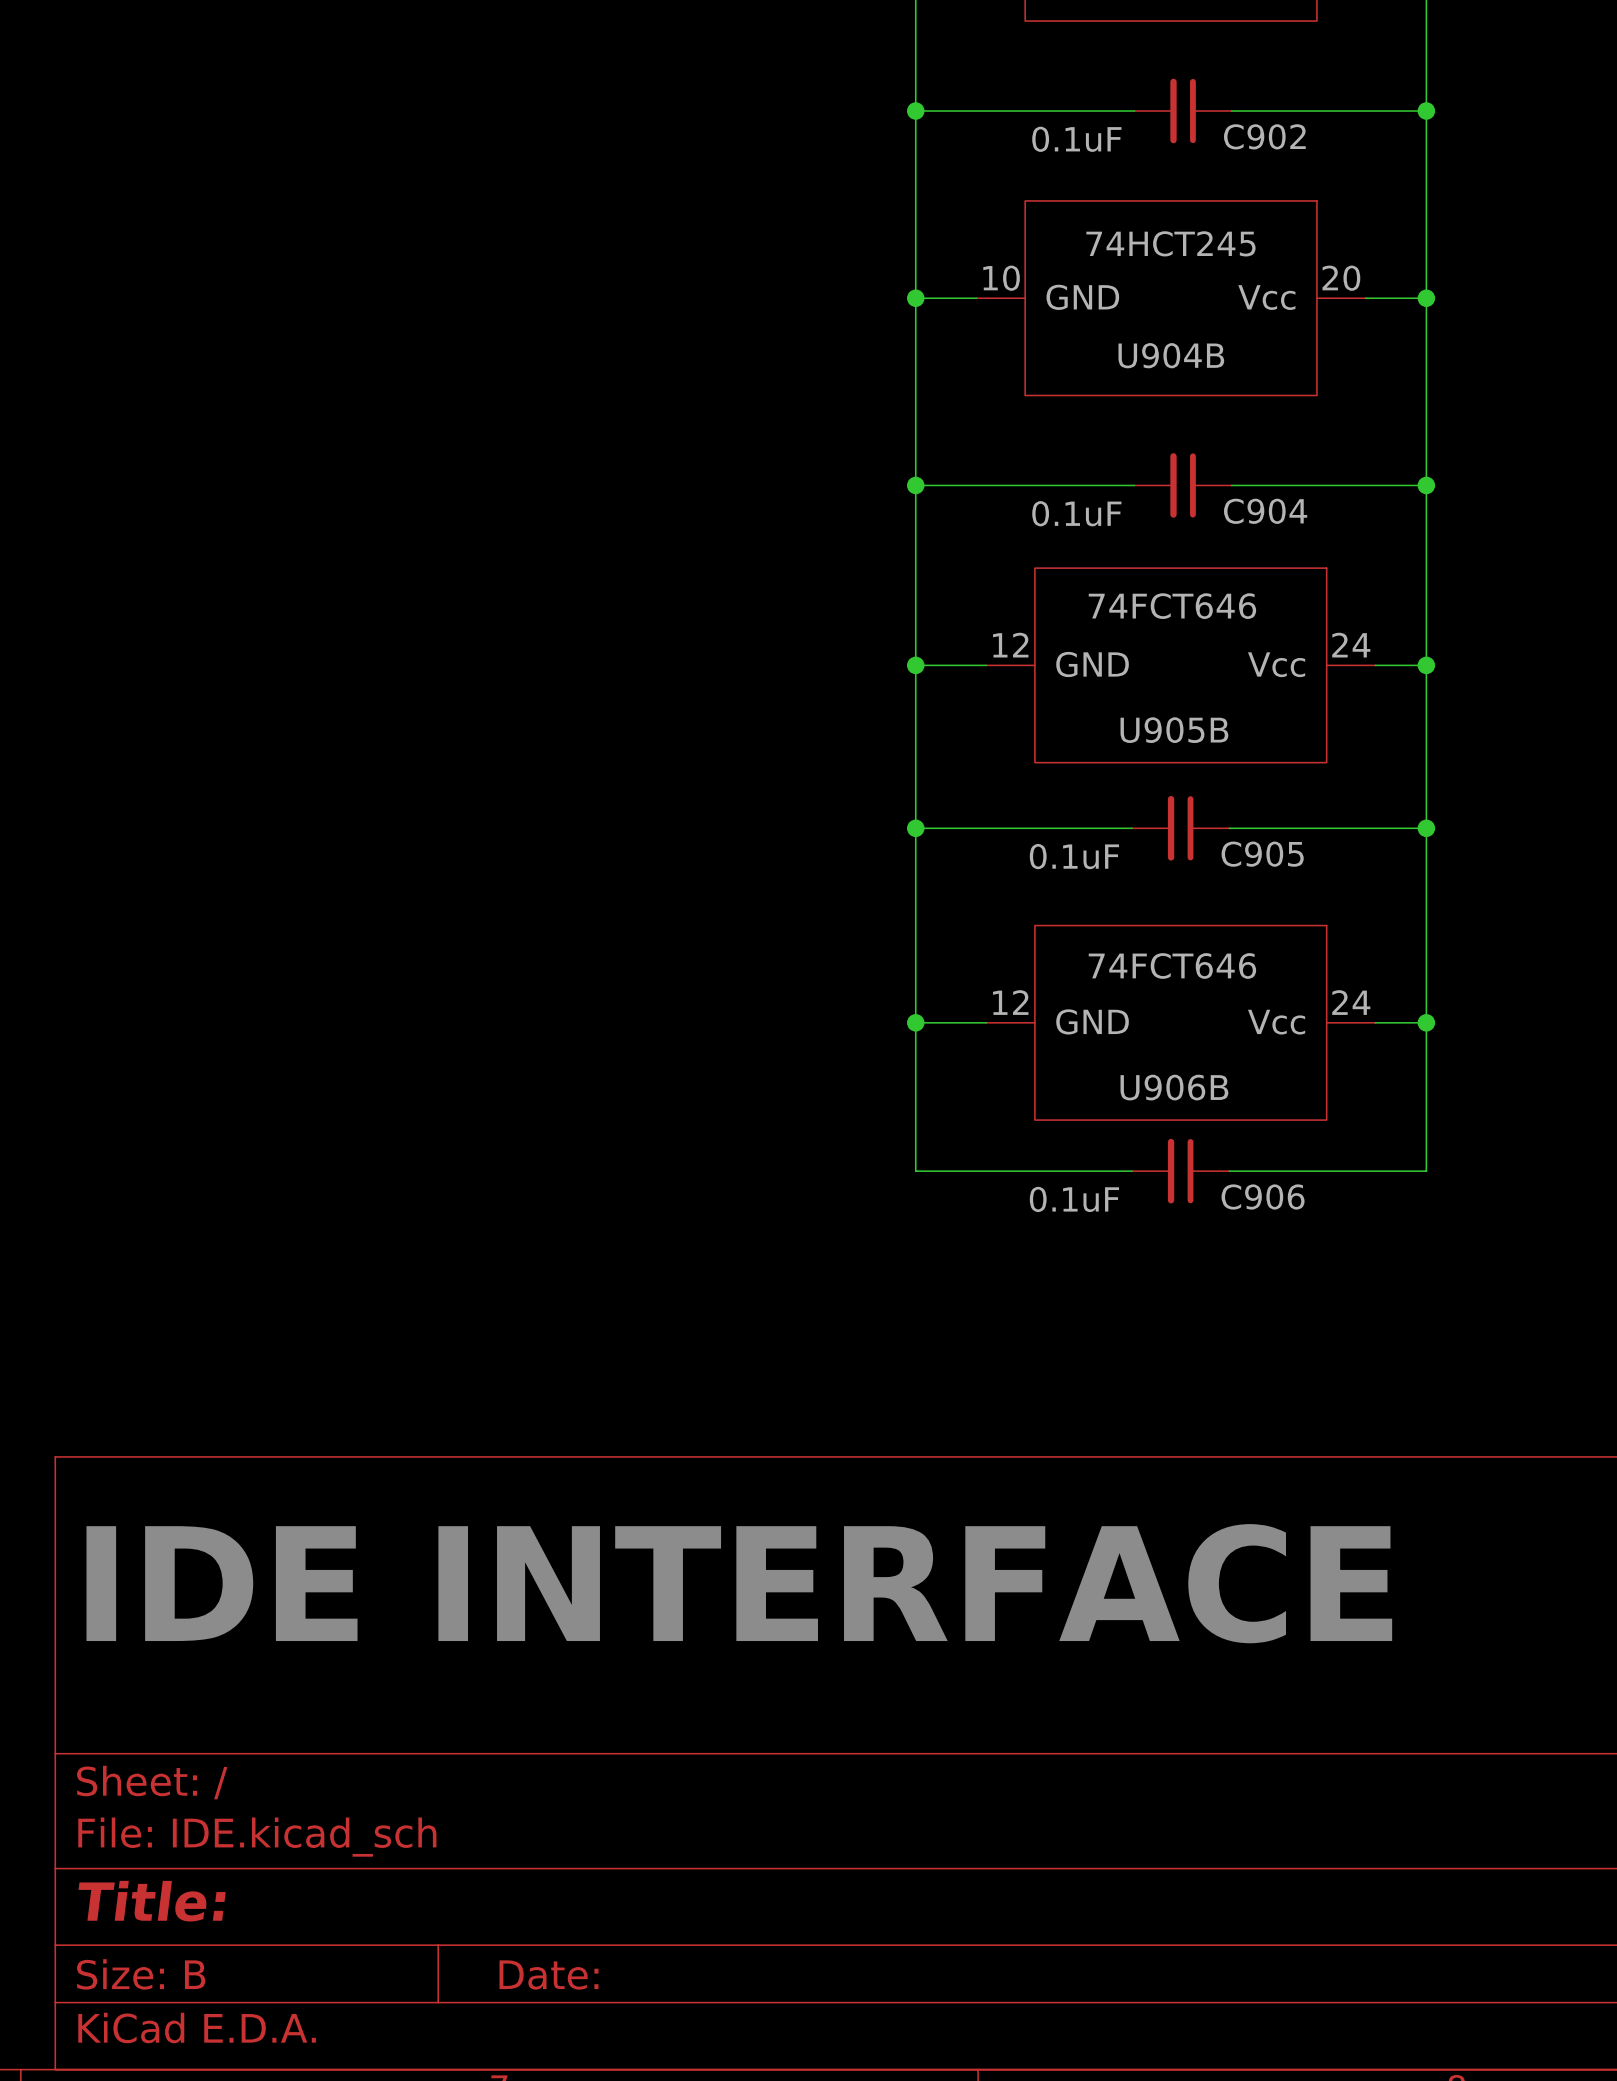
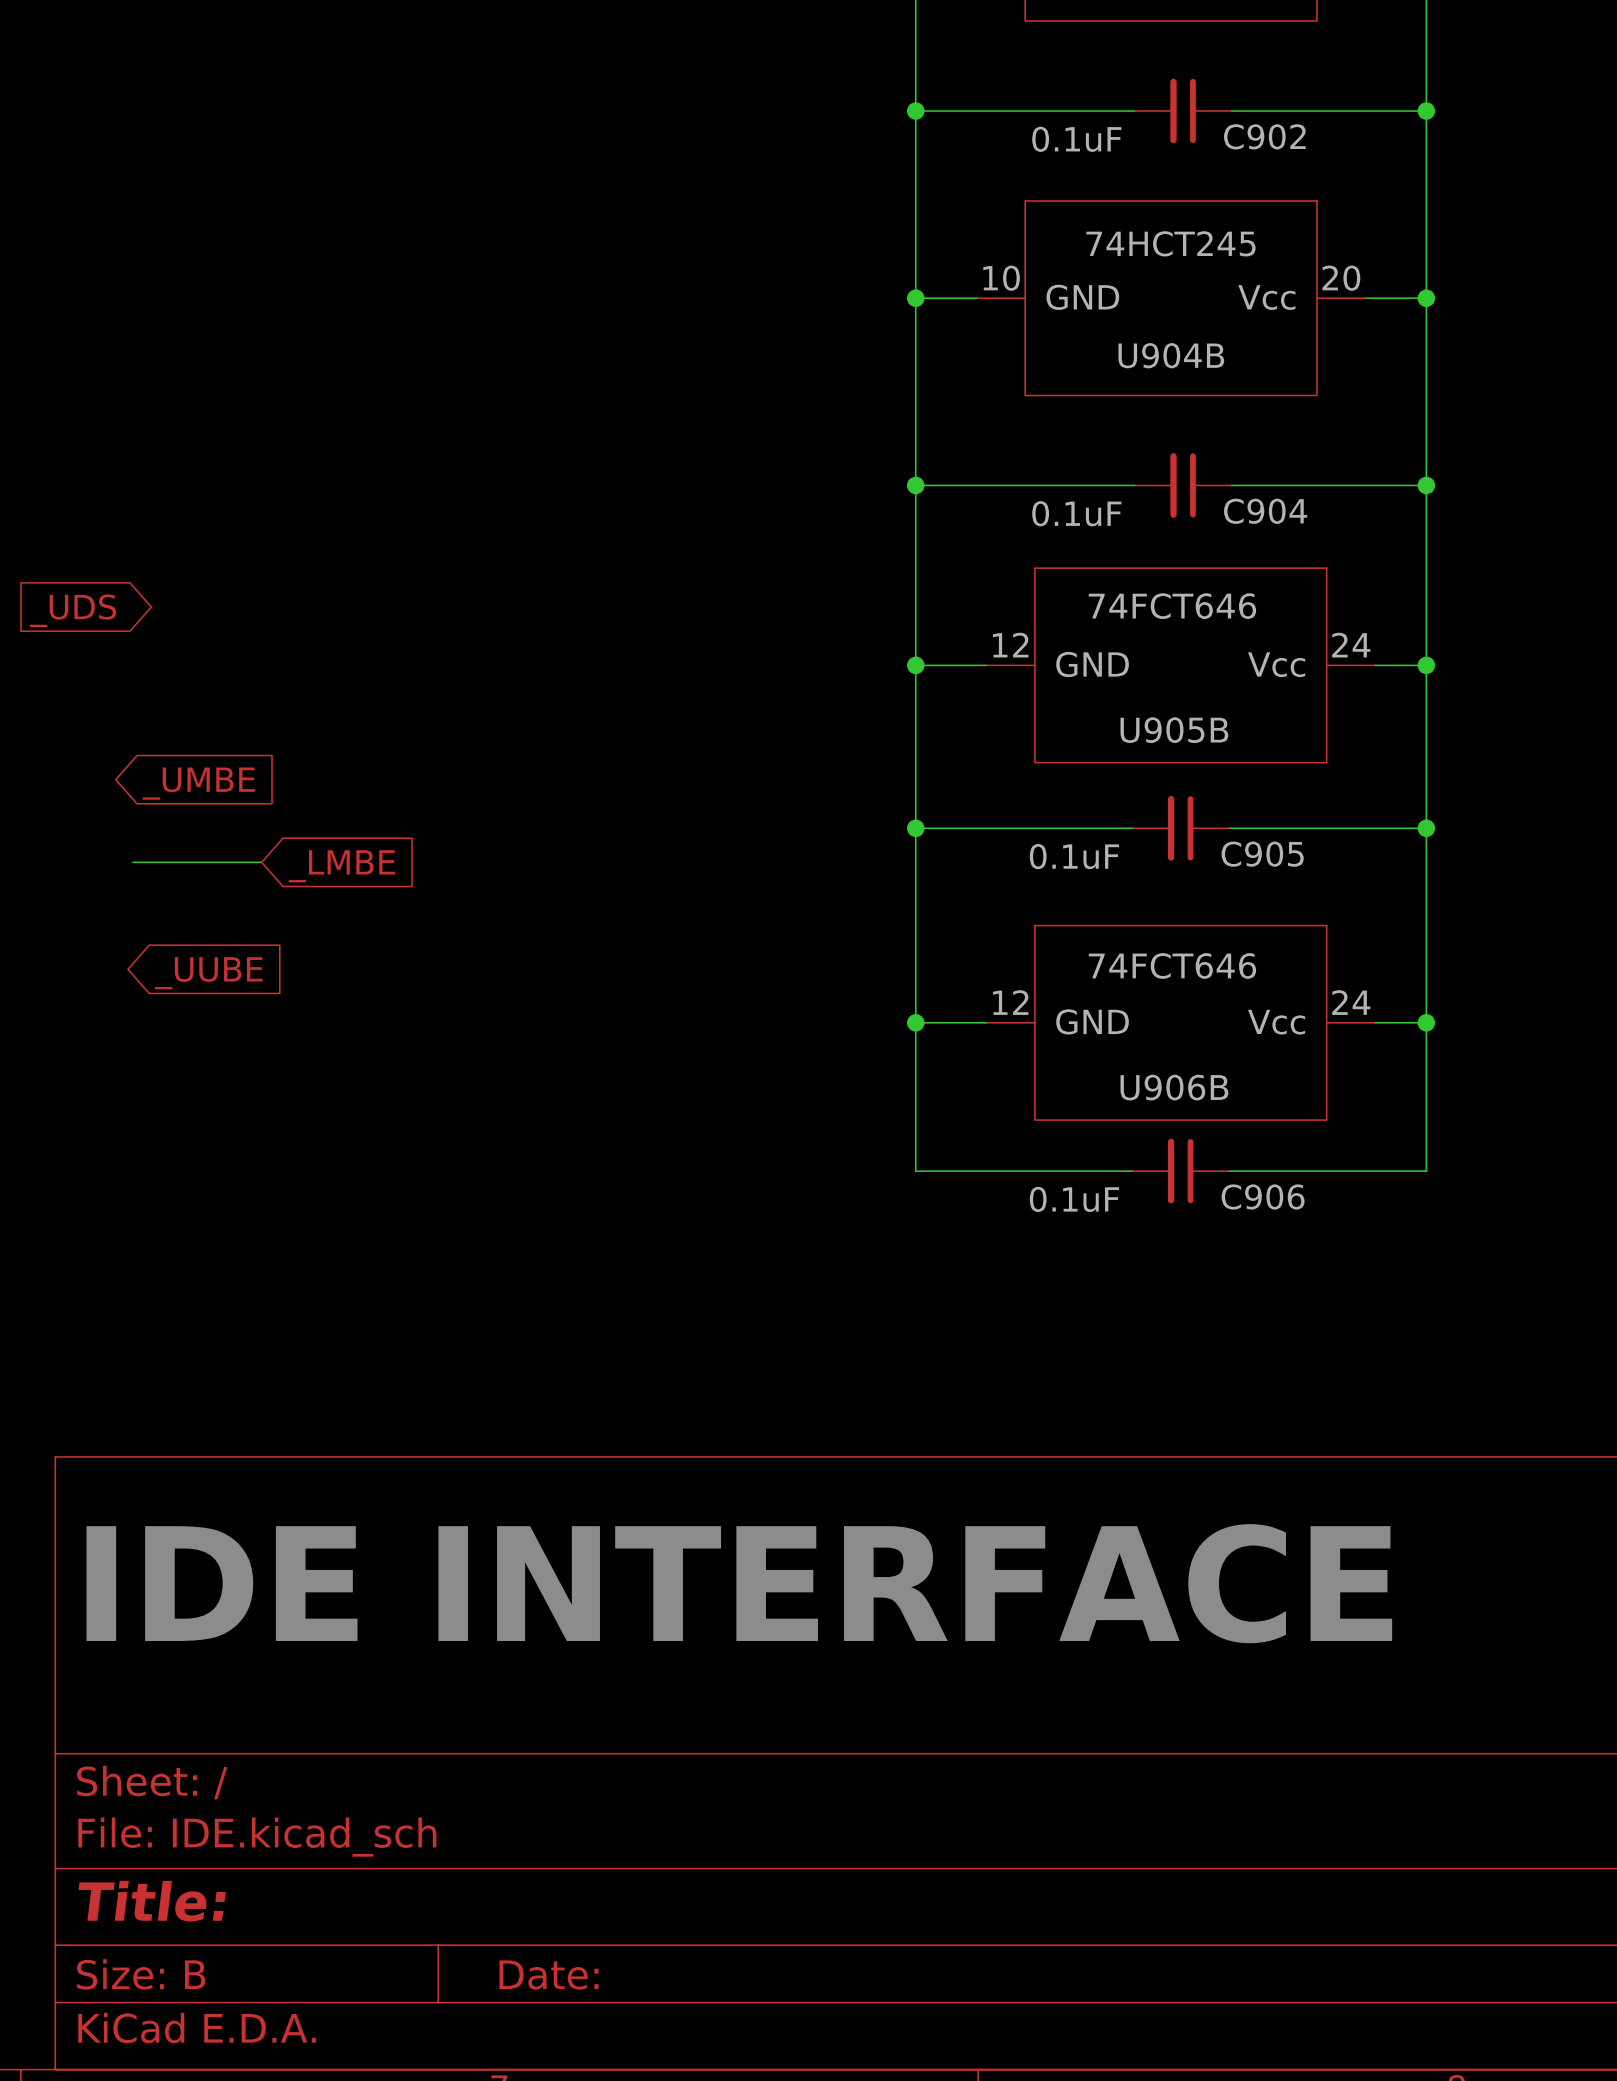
global label: none -> _UDS (72, 610)
global label: none -> _UMBE (198, 783)
wire: none -> (132, 862) (261, 862)
global label: none -> _LMBE (341, 866)
global label: none -> _UUBE (208, 973)

